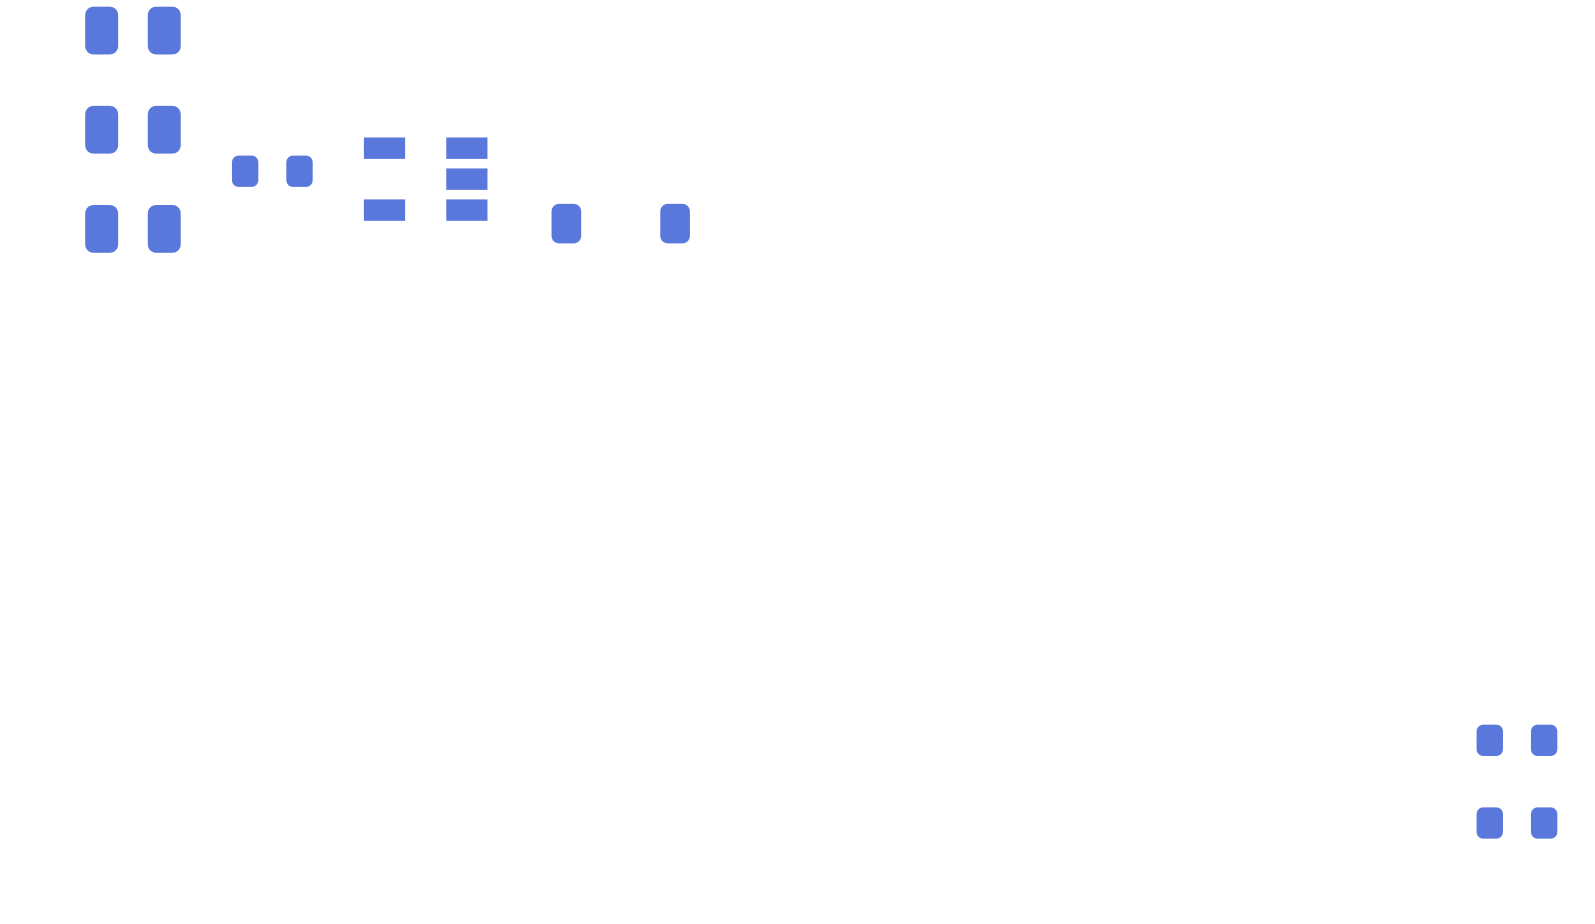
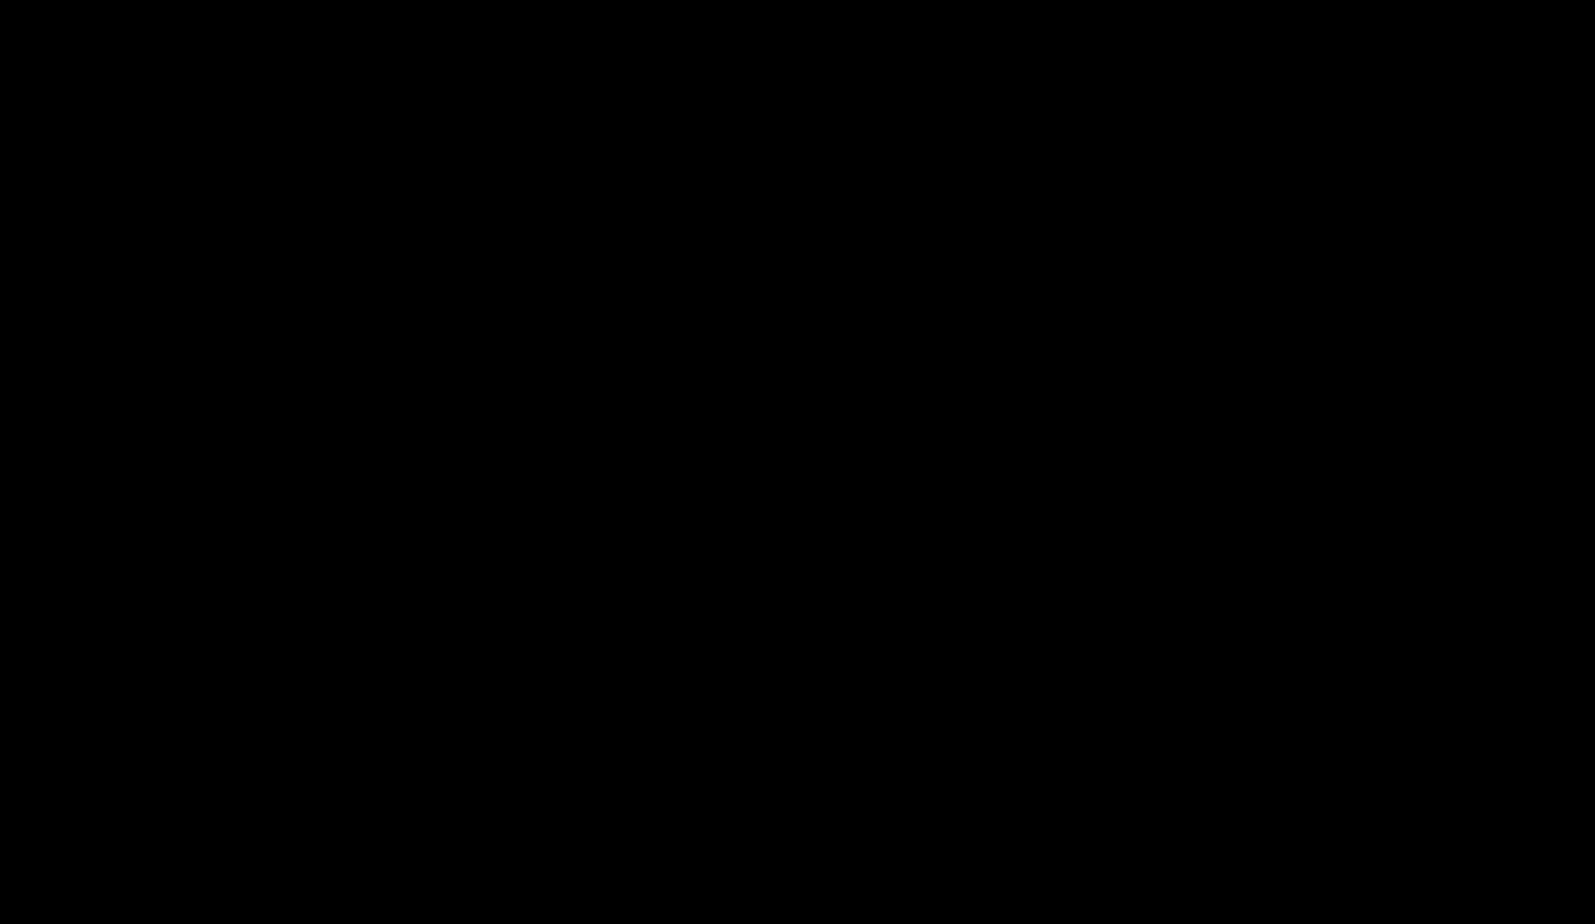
part: (132, 30) -> none
part: (132, 129) -> none
part: (272, 171) -> none
part: (425, 179) -> none
part: (620, 223) -> none
part: (132, 228) -> none
part: (1516, 740) -> none
part: (1516, 823) -> none

